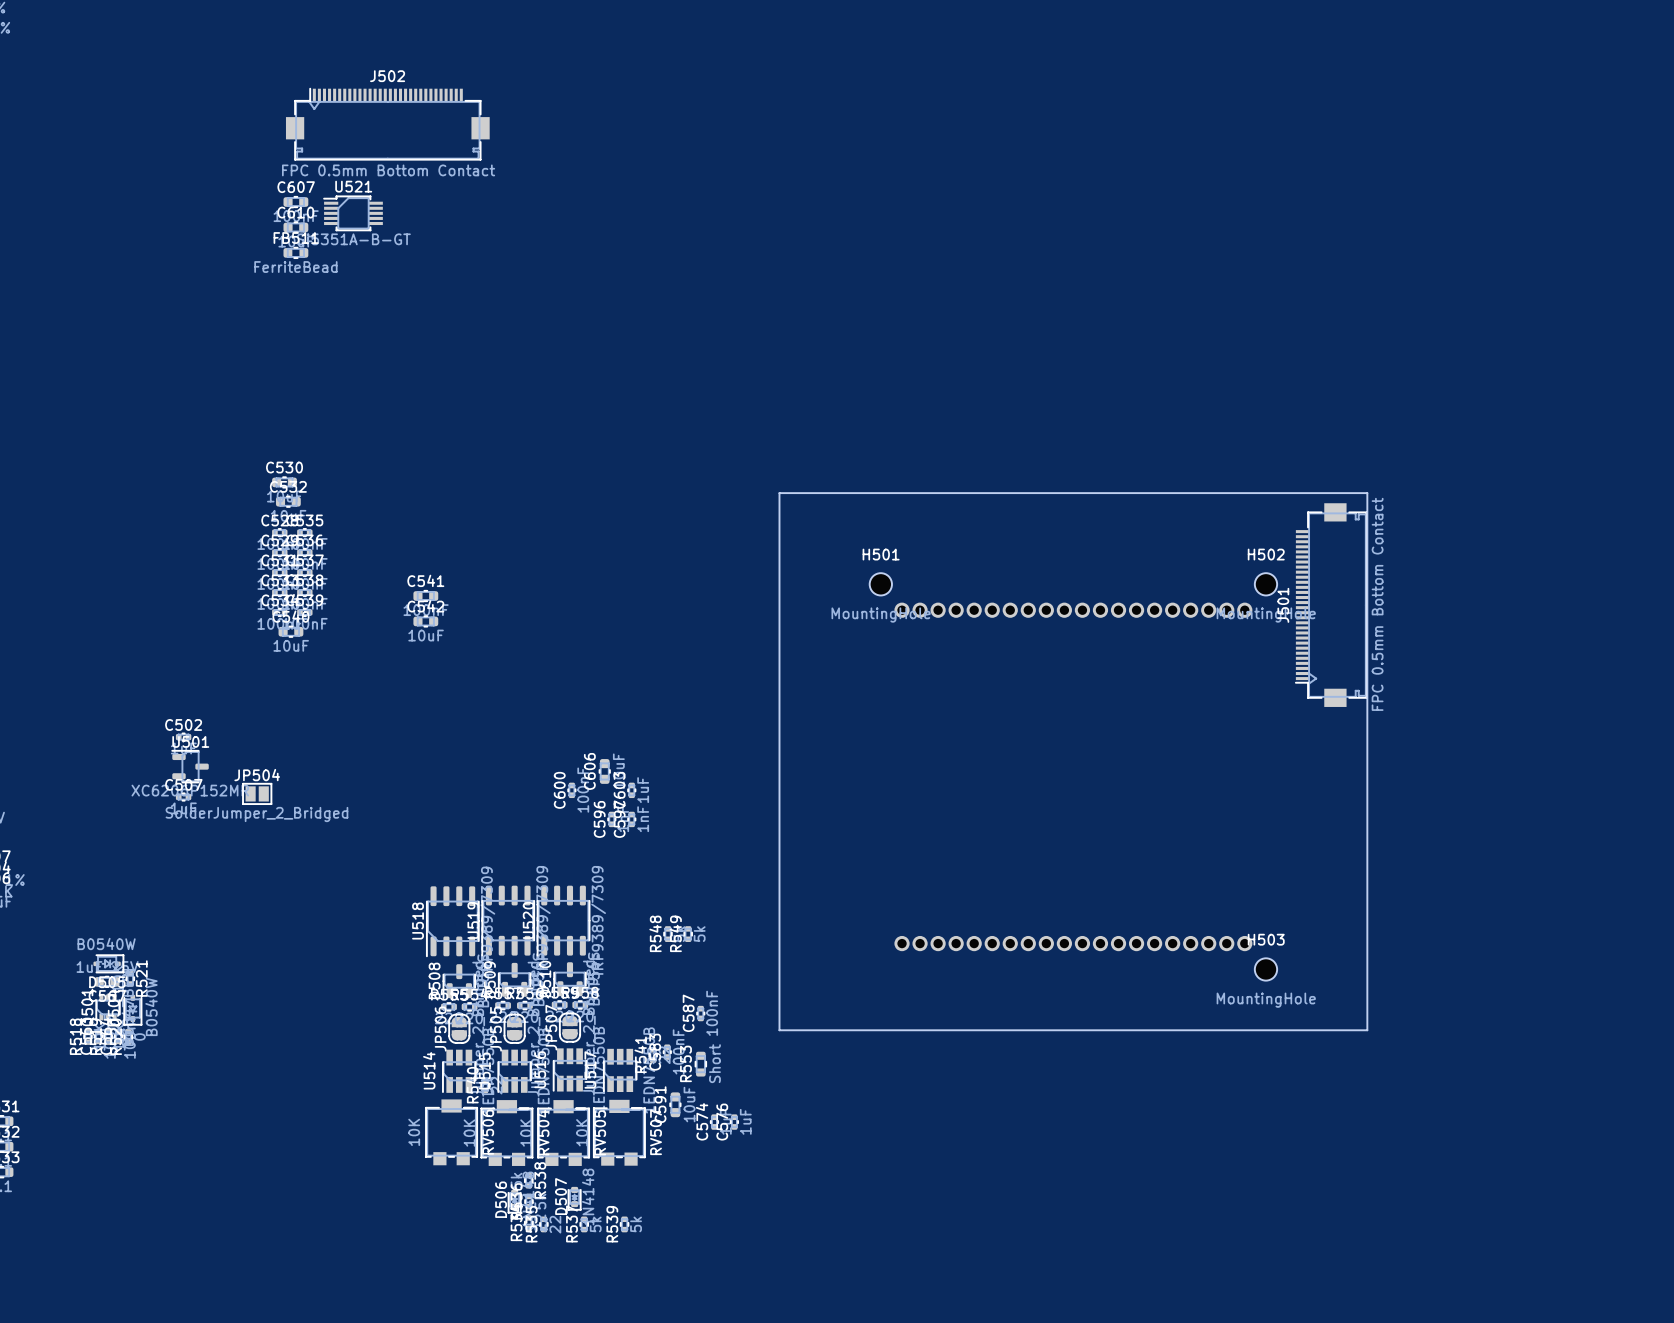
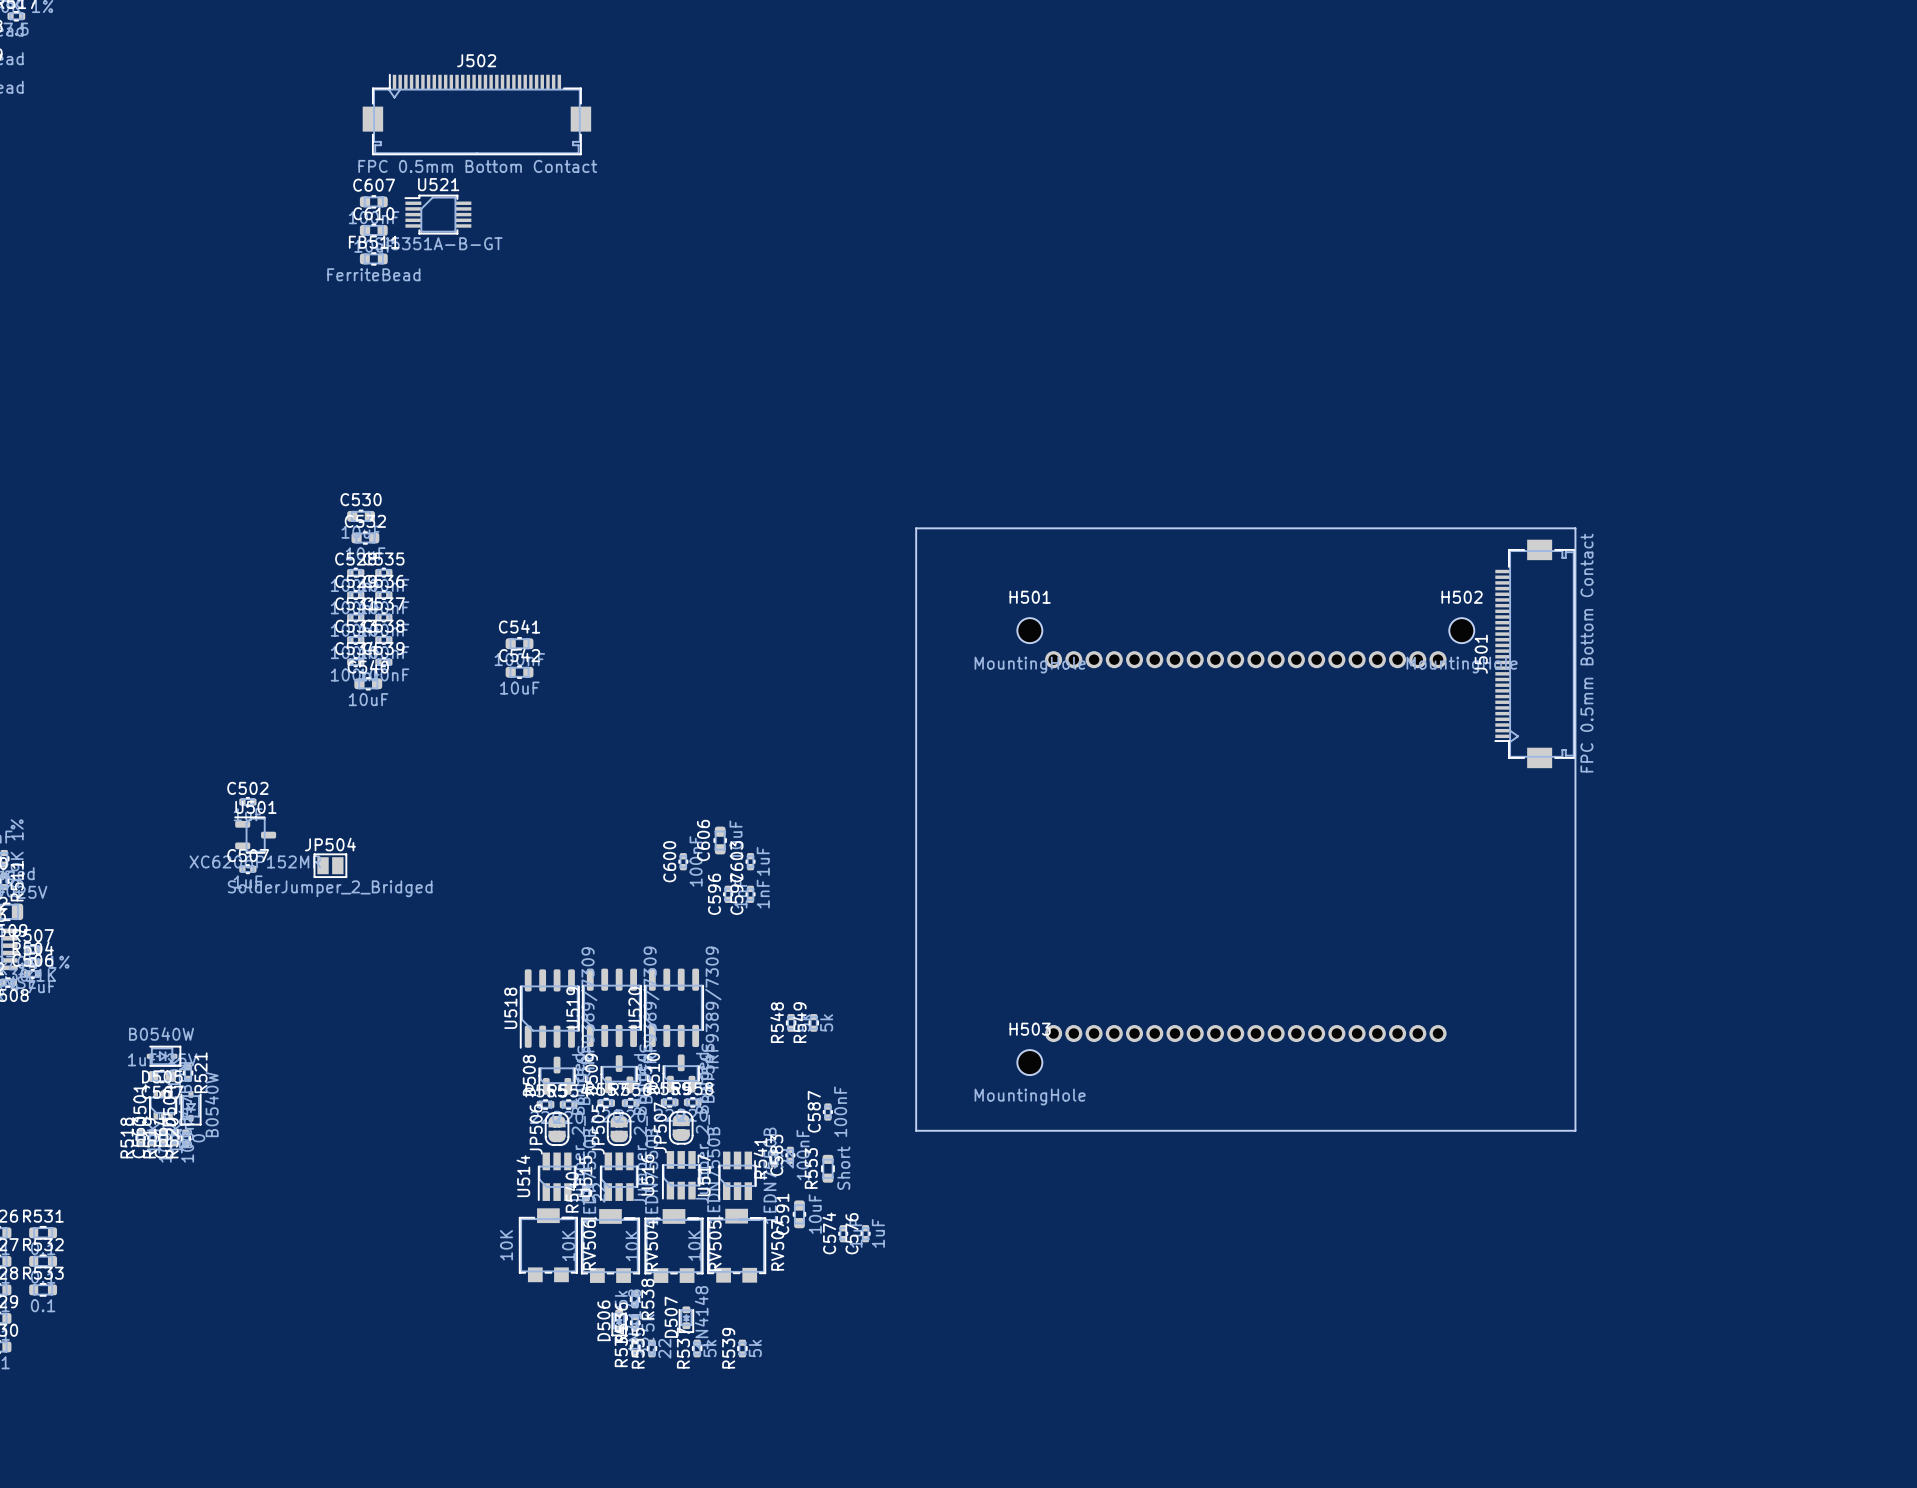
H503 position: (1265, 969) -> (1029, 1062)

